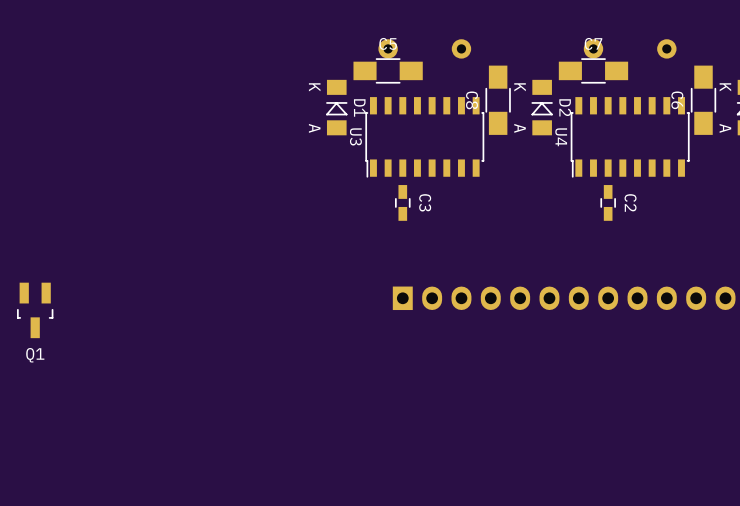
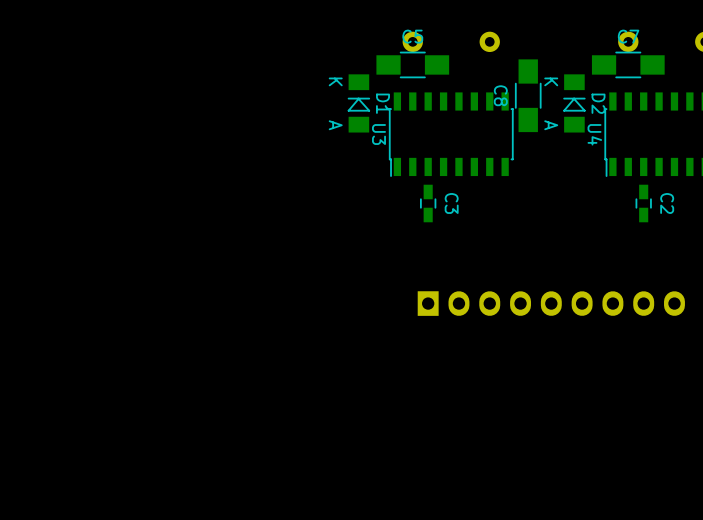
Q1: (35, 310) -> none

